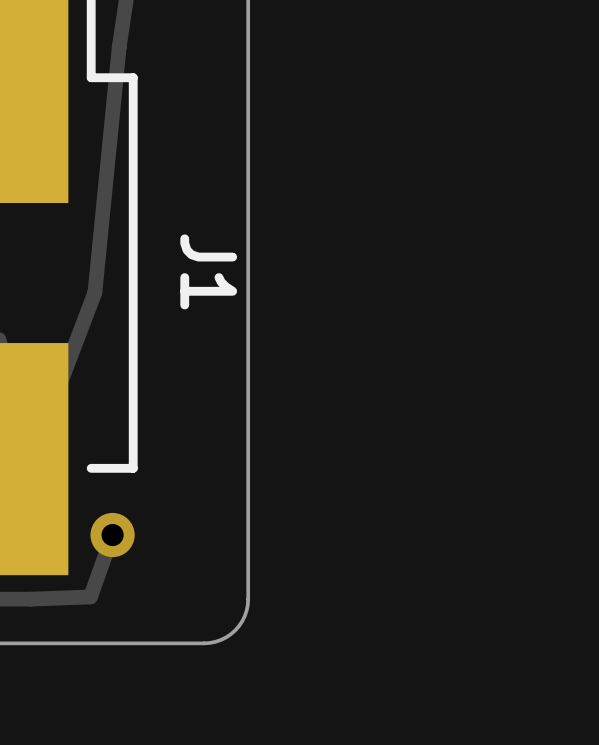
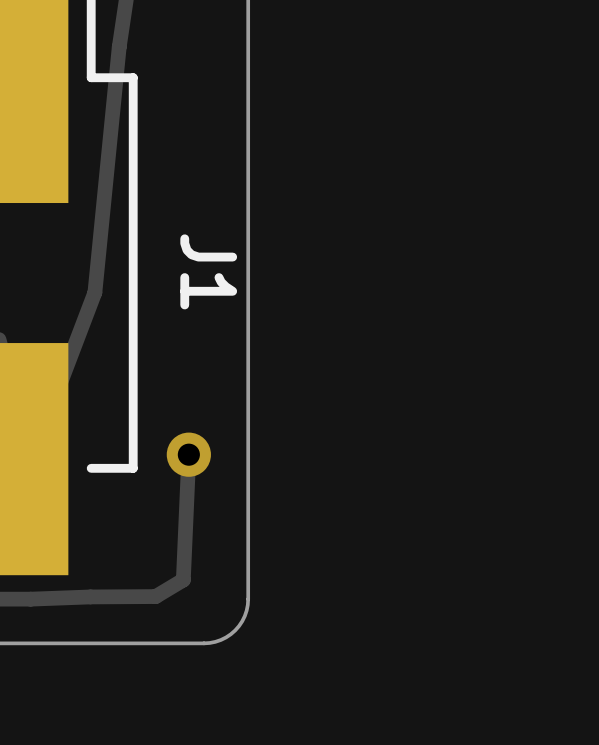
via: none -> (188, 454)
track: (112, 535) (90, 596) -> (188, 454) (183, 579) (155, 596) (90, 596)
via: (112, 535) -> none

